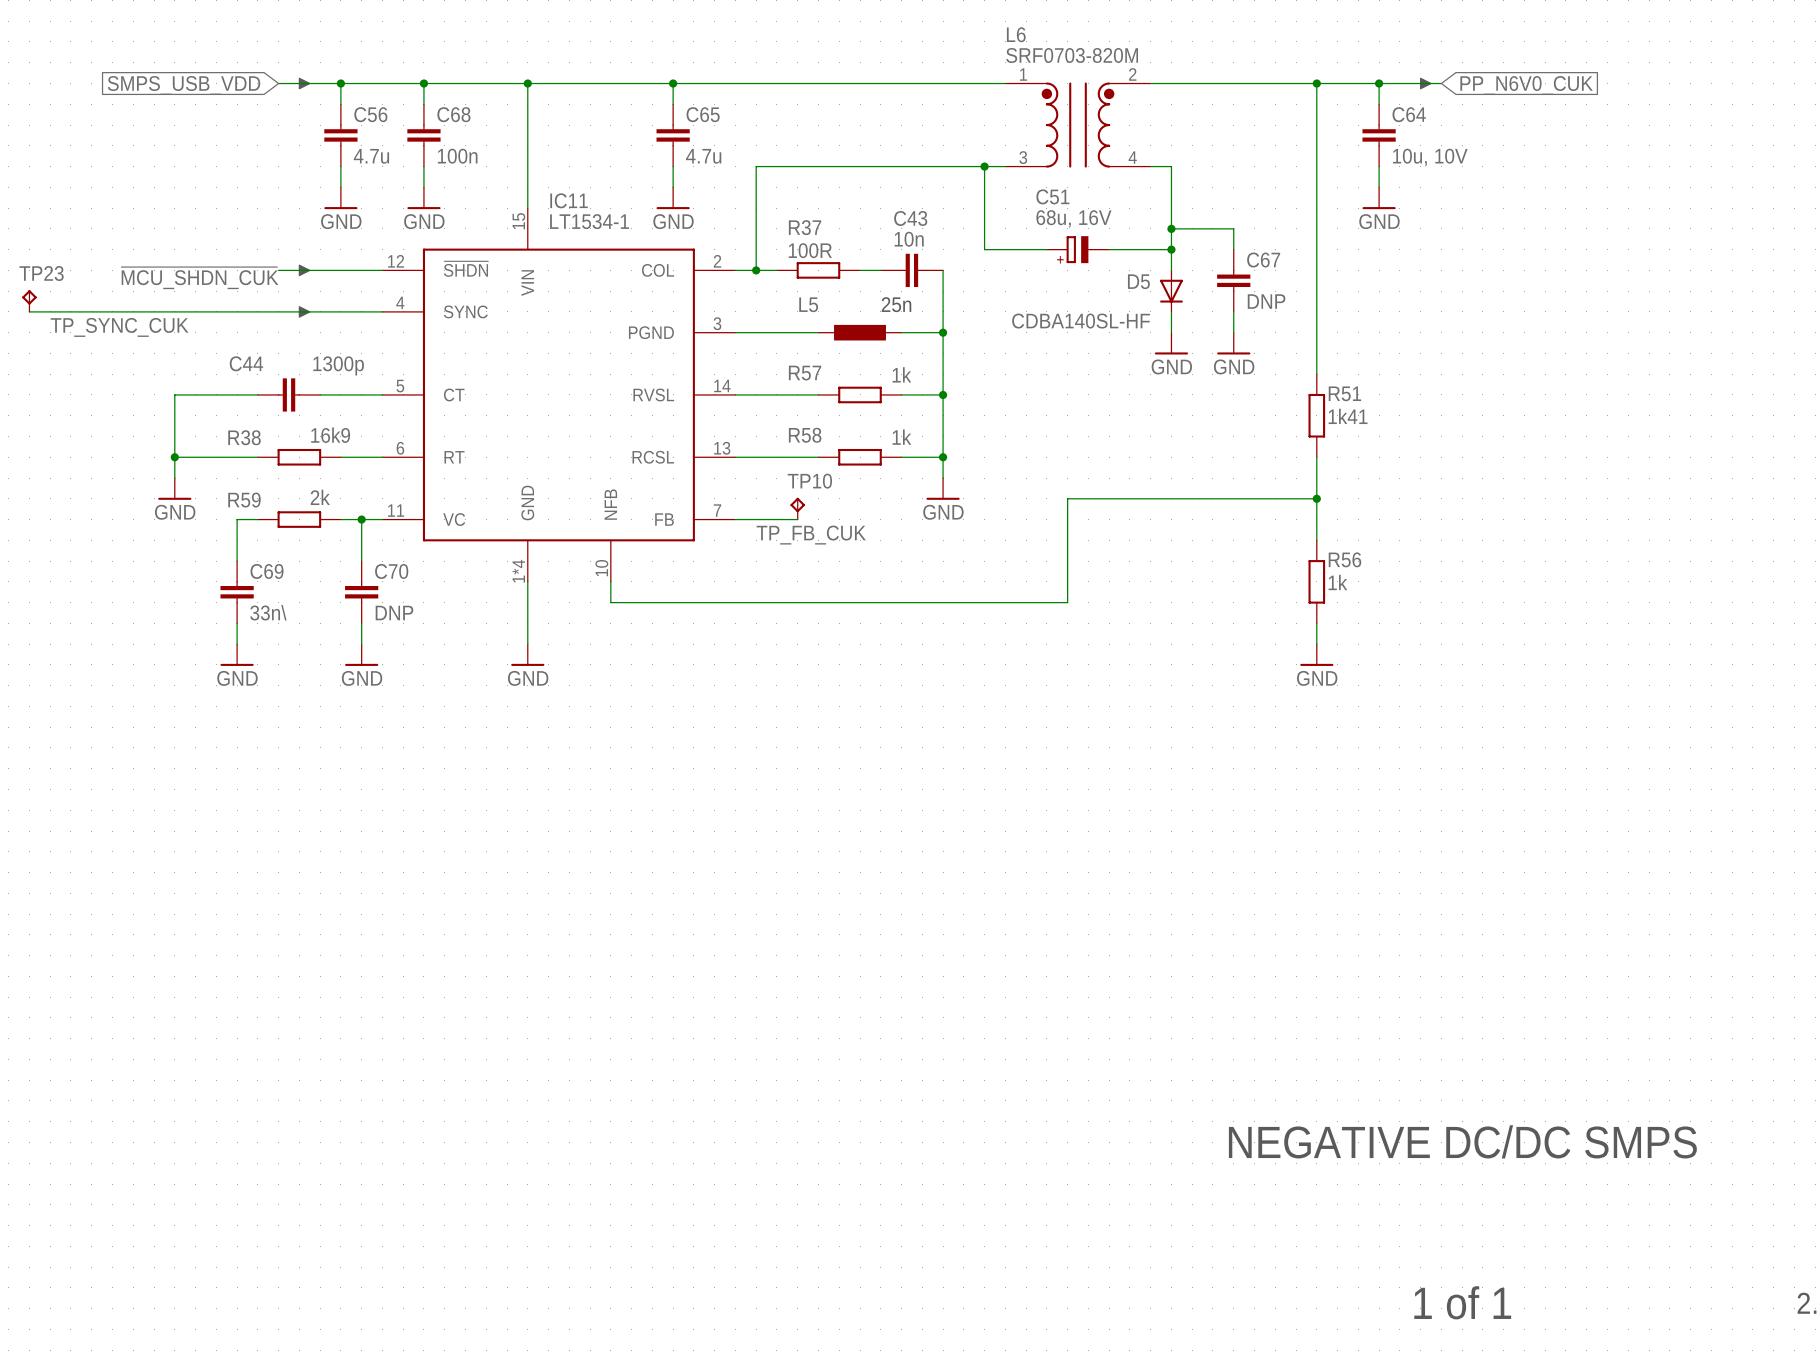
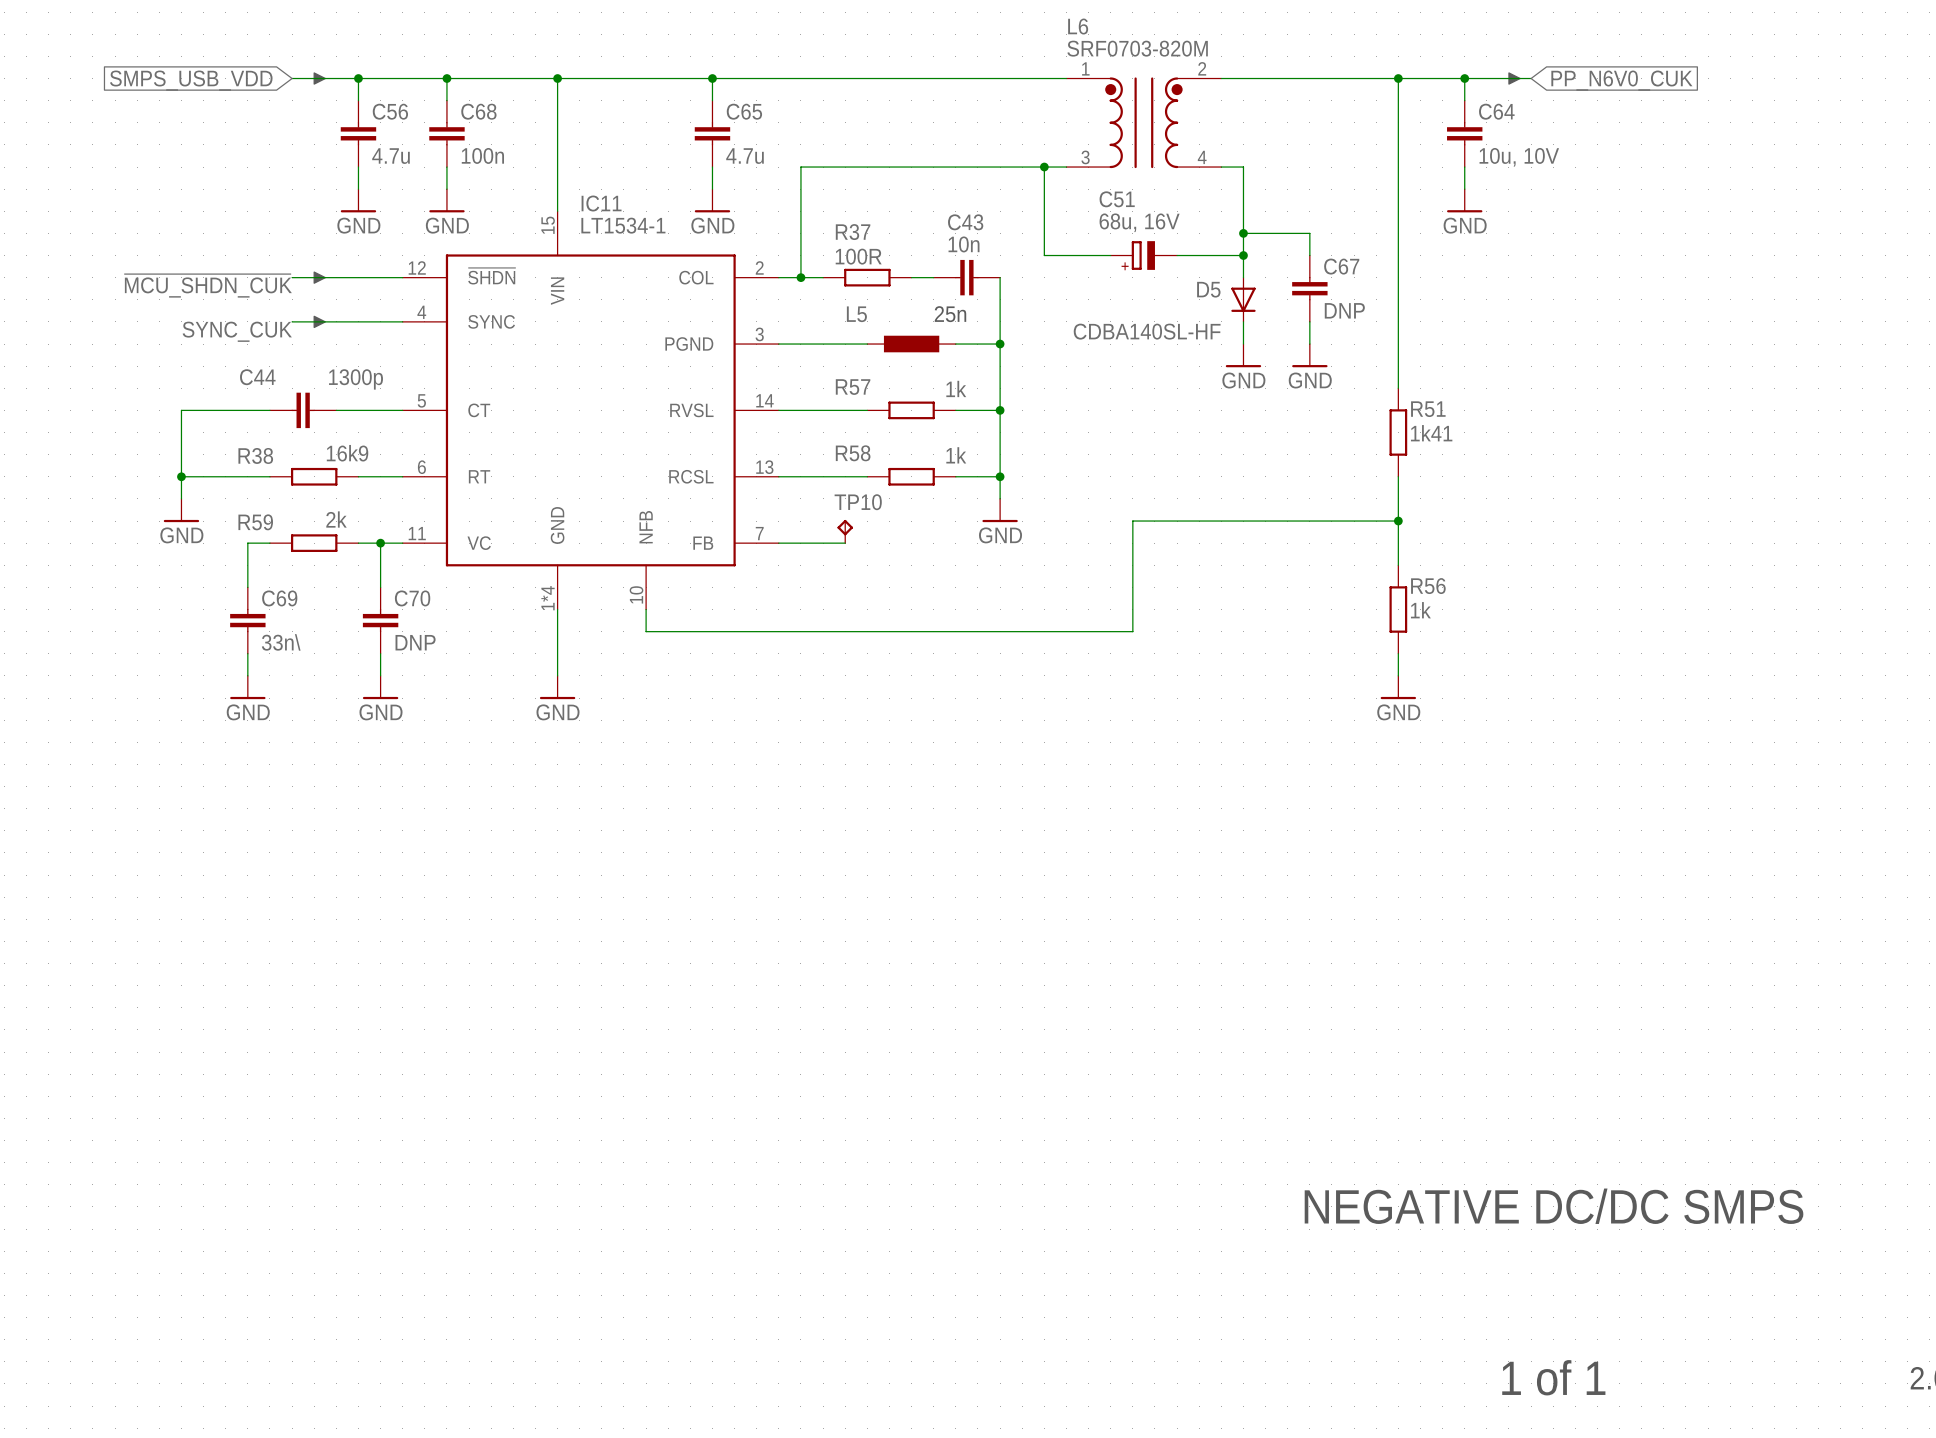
TP23: (29, 301) -> none
wire: (29, 311) (278, 311) -> none
label: none -> SYNC_CUK (237, 331)
label: TP_SYNC_CUK (119, 327) -> none
label: TP_FB_CUK (811, 535) -> none

